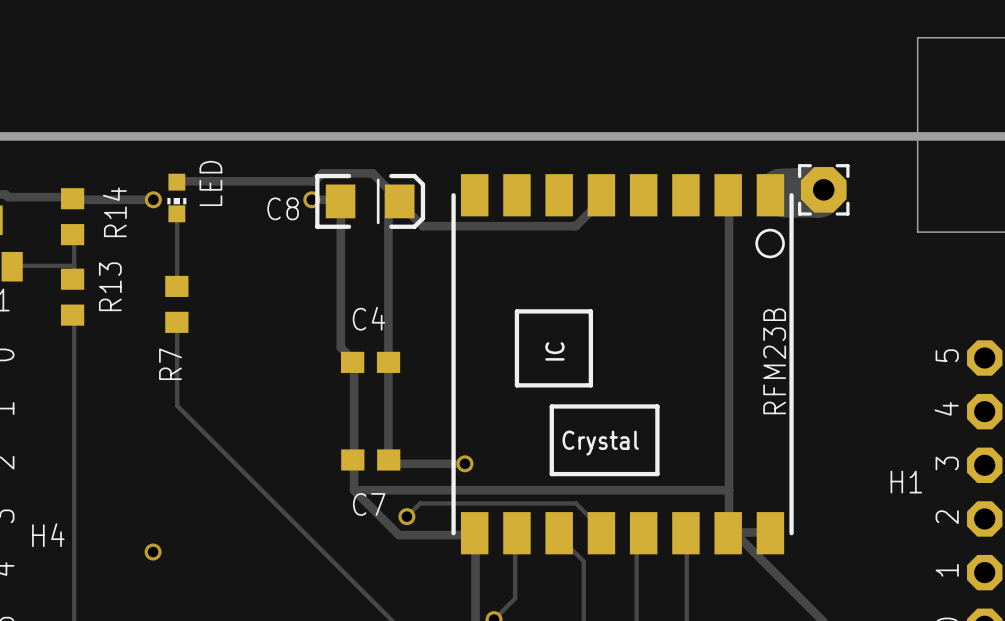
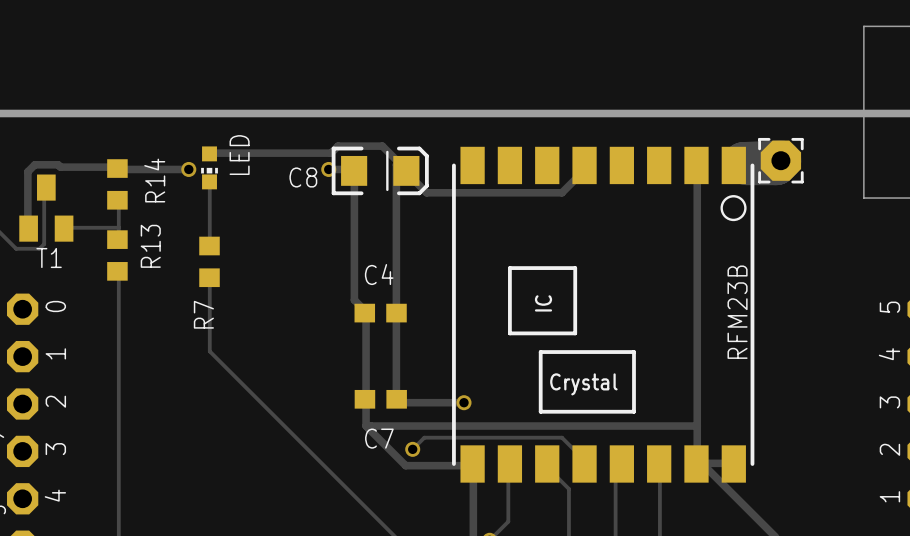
text: H1 (906, 482) -> none
text: H4 (48, 535) -> none
via: (153, 552) -> none

